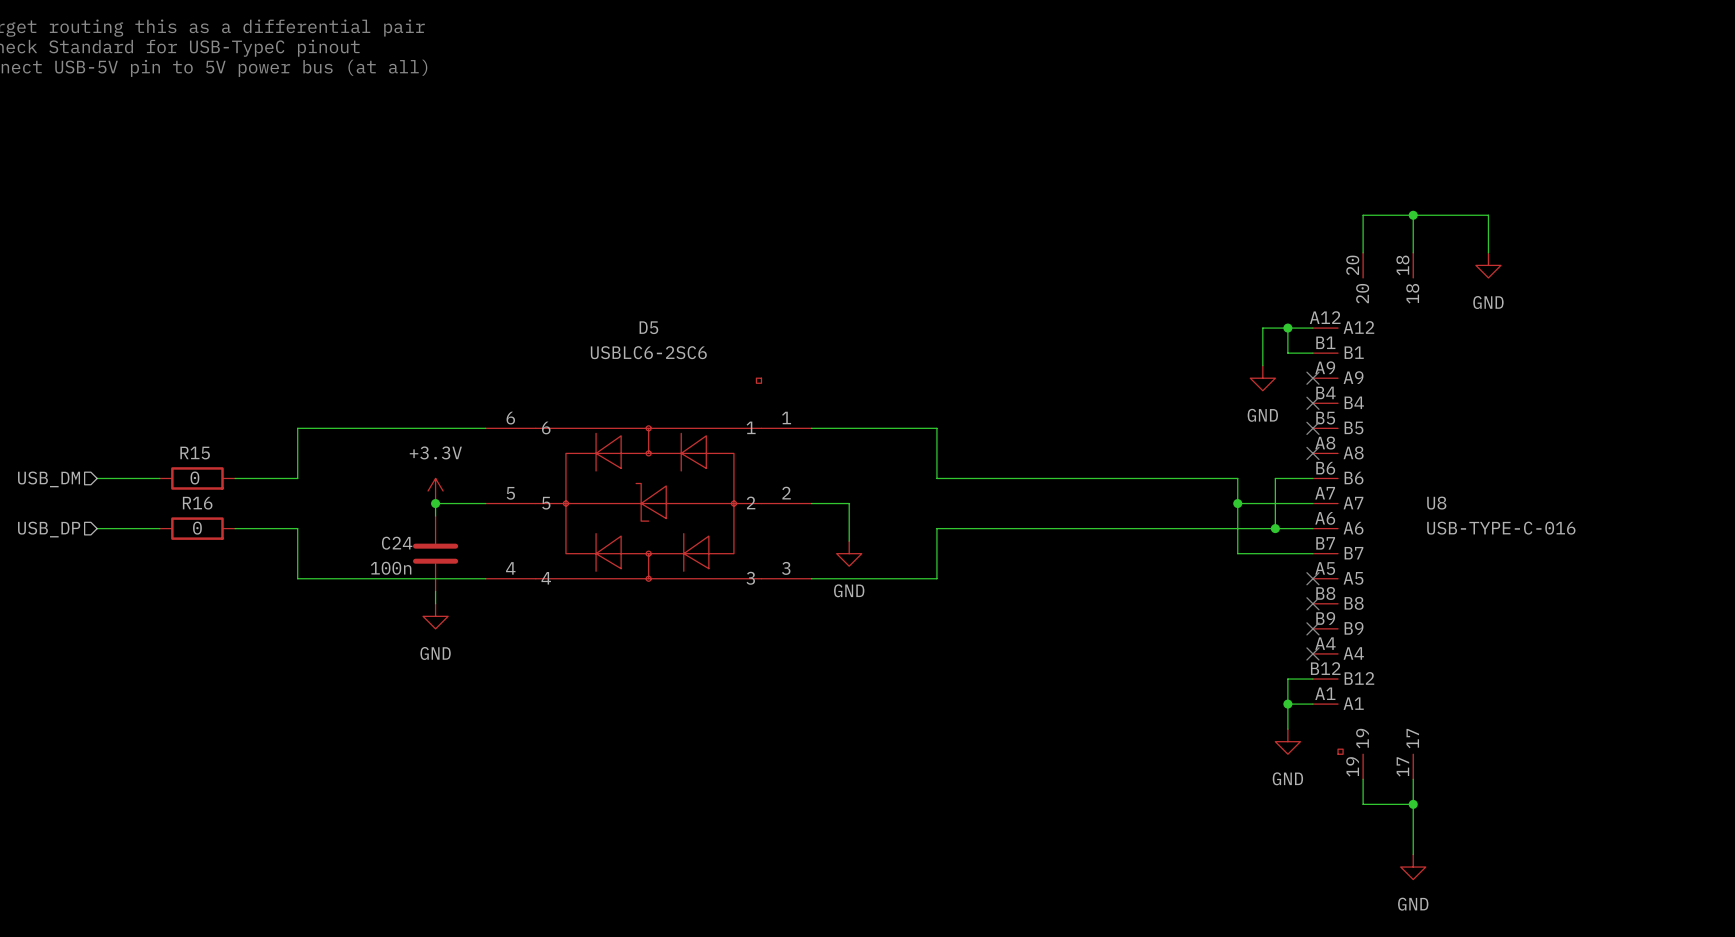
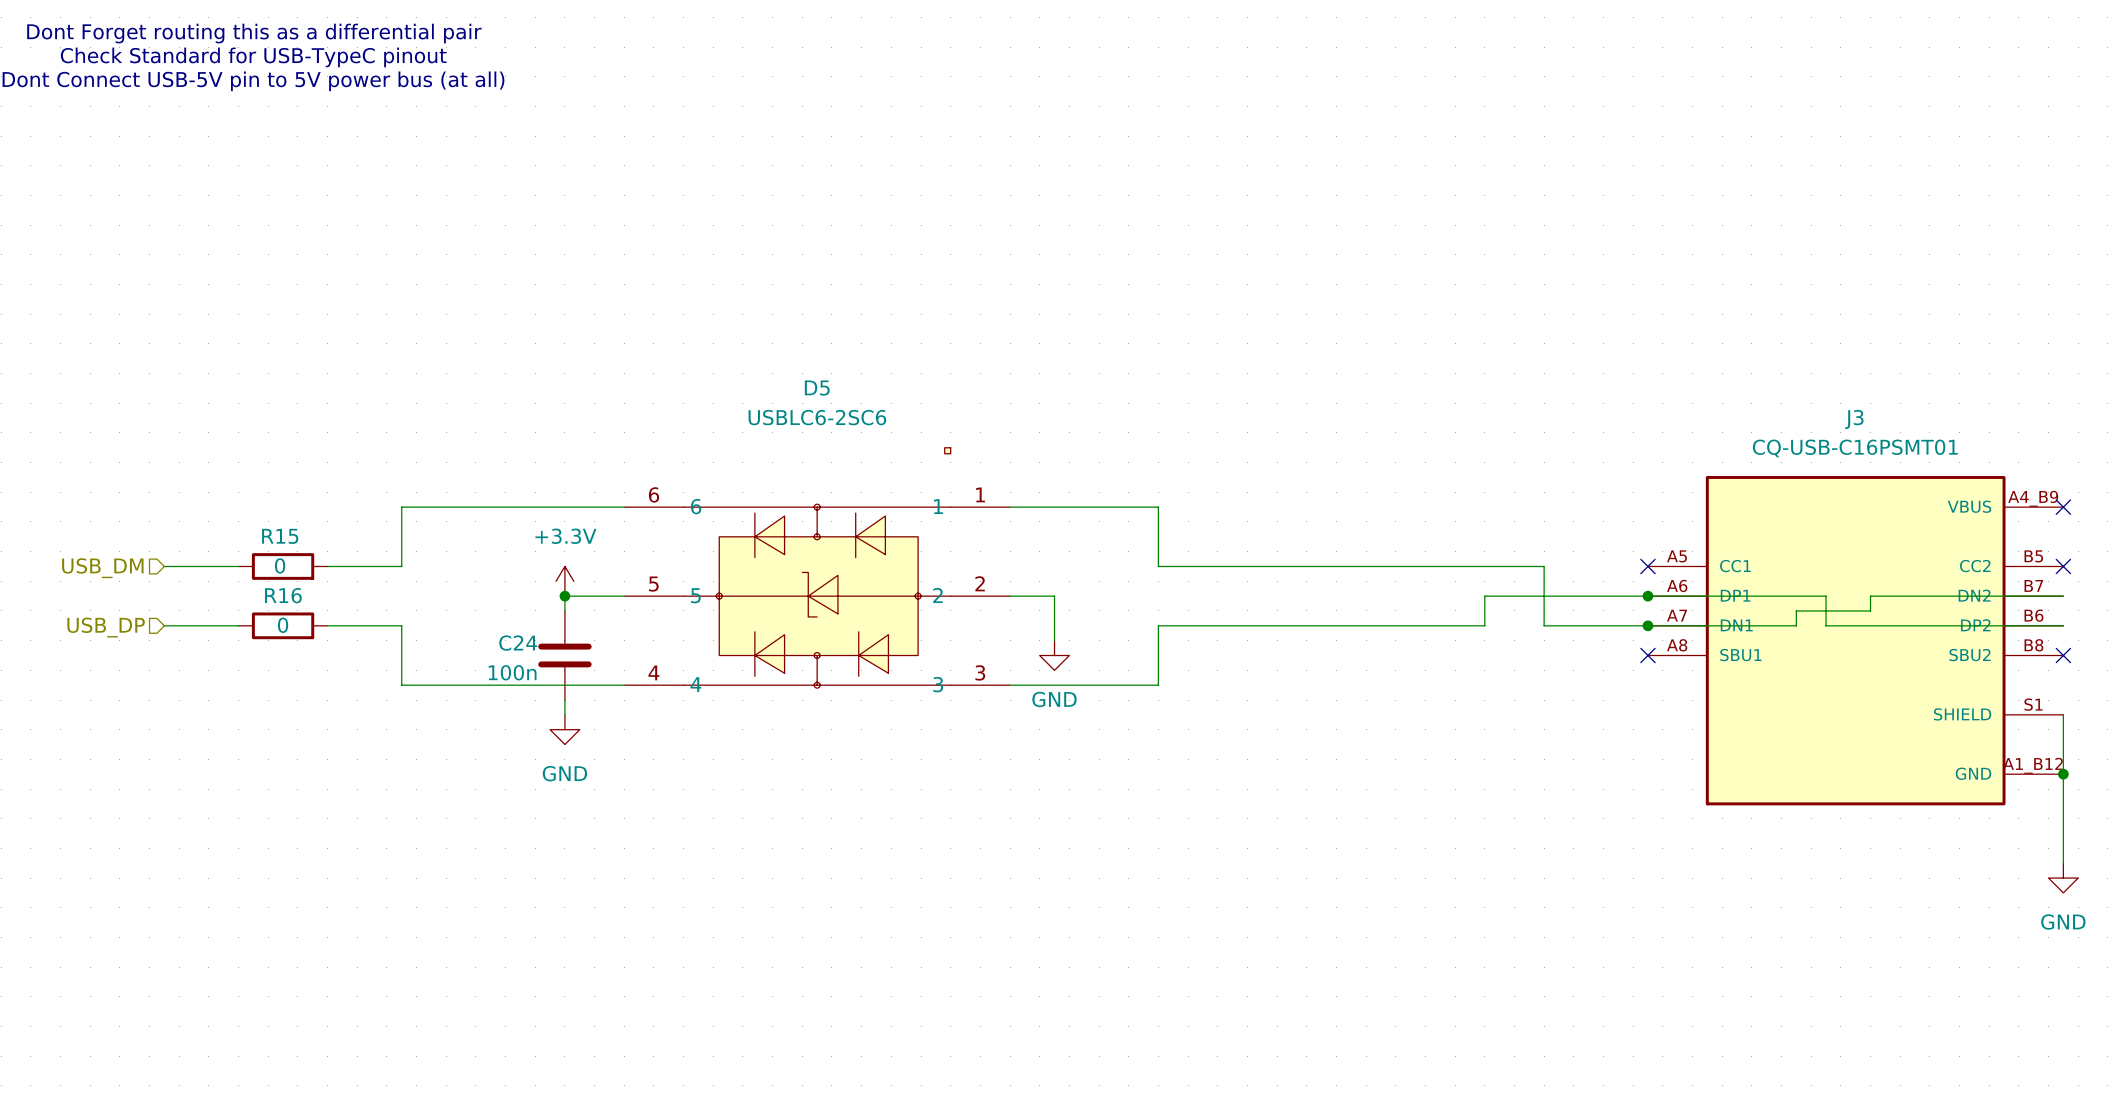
wire: (1413, 215) (1413, 252) -> none
junction: (1413, 215) -> none
wire: (1363, 252) (1363, 215) (1488, 215) (1488, 252) -> none
power symbol: GND (1488, 265) -> none
wire: (1287, 328) (1287, 353) (1312, 353) -> none
junction: (1287, 328) -> none
wire: (1312, 328) (1262, 328) (1262, 365) -> none
power symbol: GND (1262, 378) -> none
no-connect mark: (1312, 378) -> none
no-connect mark: (1312, 403) -> none
no-connect mark: (1312, 428) -> none
no-connect mark: none -> (2063, 507)
no-connect mark: (1312, 453) -> none
wire: (1237, 478) (1237, 553) (1312, 553) -> (1514, 566) (1544, 566) (1544, 625)
wire: (1312, 478) (1275, 478) (1275, 528) -> none
no-connect mark: none -> (1647, 566)
no-connect mark: none -> (2063, 566)
junction: (1237, 503) -> none
wire: none -> (1603, 596) (1826, 596) (1826, 625) (2063, 625)
junction: none -> (1647, 596)
wire: none -> (2063, 596) (1870, 596) (1870, 610) (1796, 610) (1796, 625) (1603, 625)
U8: USB-TYPE-C-016 (1363, 516) -> none
wire: (1212, 528) (1262, 528) -> (1484, 625) (1484, 596) (1514, 596)
junction: (1275, 528) -> none
junction: none -> (1647, 625)
J3: none -> CQ-USB-C16PSMT01 (1855, 640)
no-connect mark: none -> (1647, 655)
no-connect mark: none -> (2063, 655)
no-connect mark: (1312, 578) -> none
no-connect mark: (1312, 603) -> none
wire: none -> (2063, 714) (2063, 863)
no-connect mark: (1312, 628) -> none
no-connect mark: (1312, 653) -> none
junction: none -> (2063, 774)
wire: (1312, 679) (1287, 679) (1287, 729) -> none
wire: (1287, 704) (1312, 704) -> none
junction: (1287, 704) -> none
power symbol: GND (1287, 741) -> none
power symbol: none -> GND (2063, 878)
wire: (1363, 779) (1363, 804) (1413, 804) -> none
wire: (1413, 779) (1413, 854) -> none
junction: (1413, 804) -> none
power symbol: GND (1413, 867) -> none

